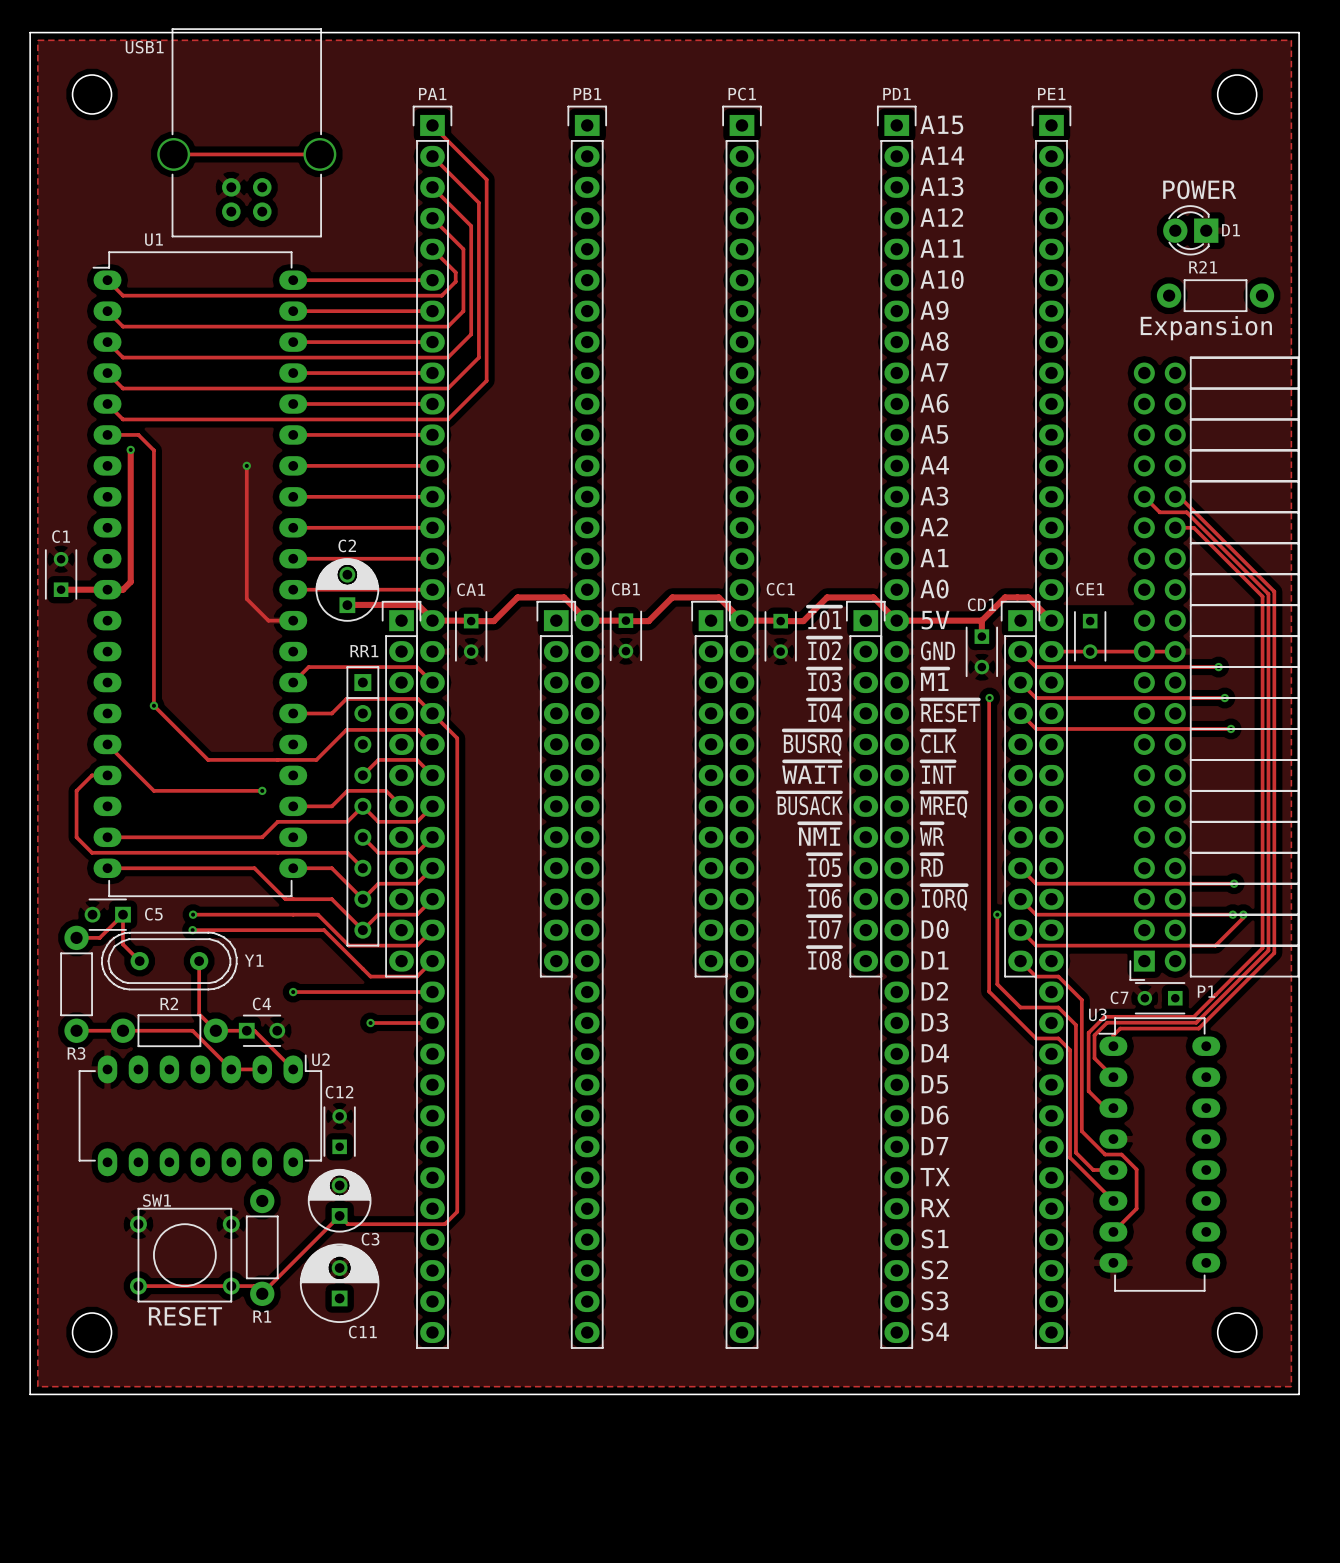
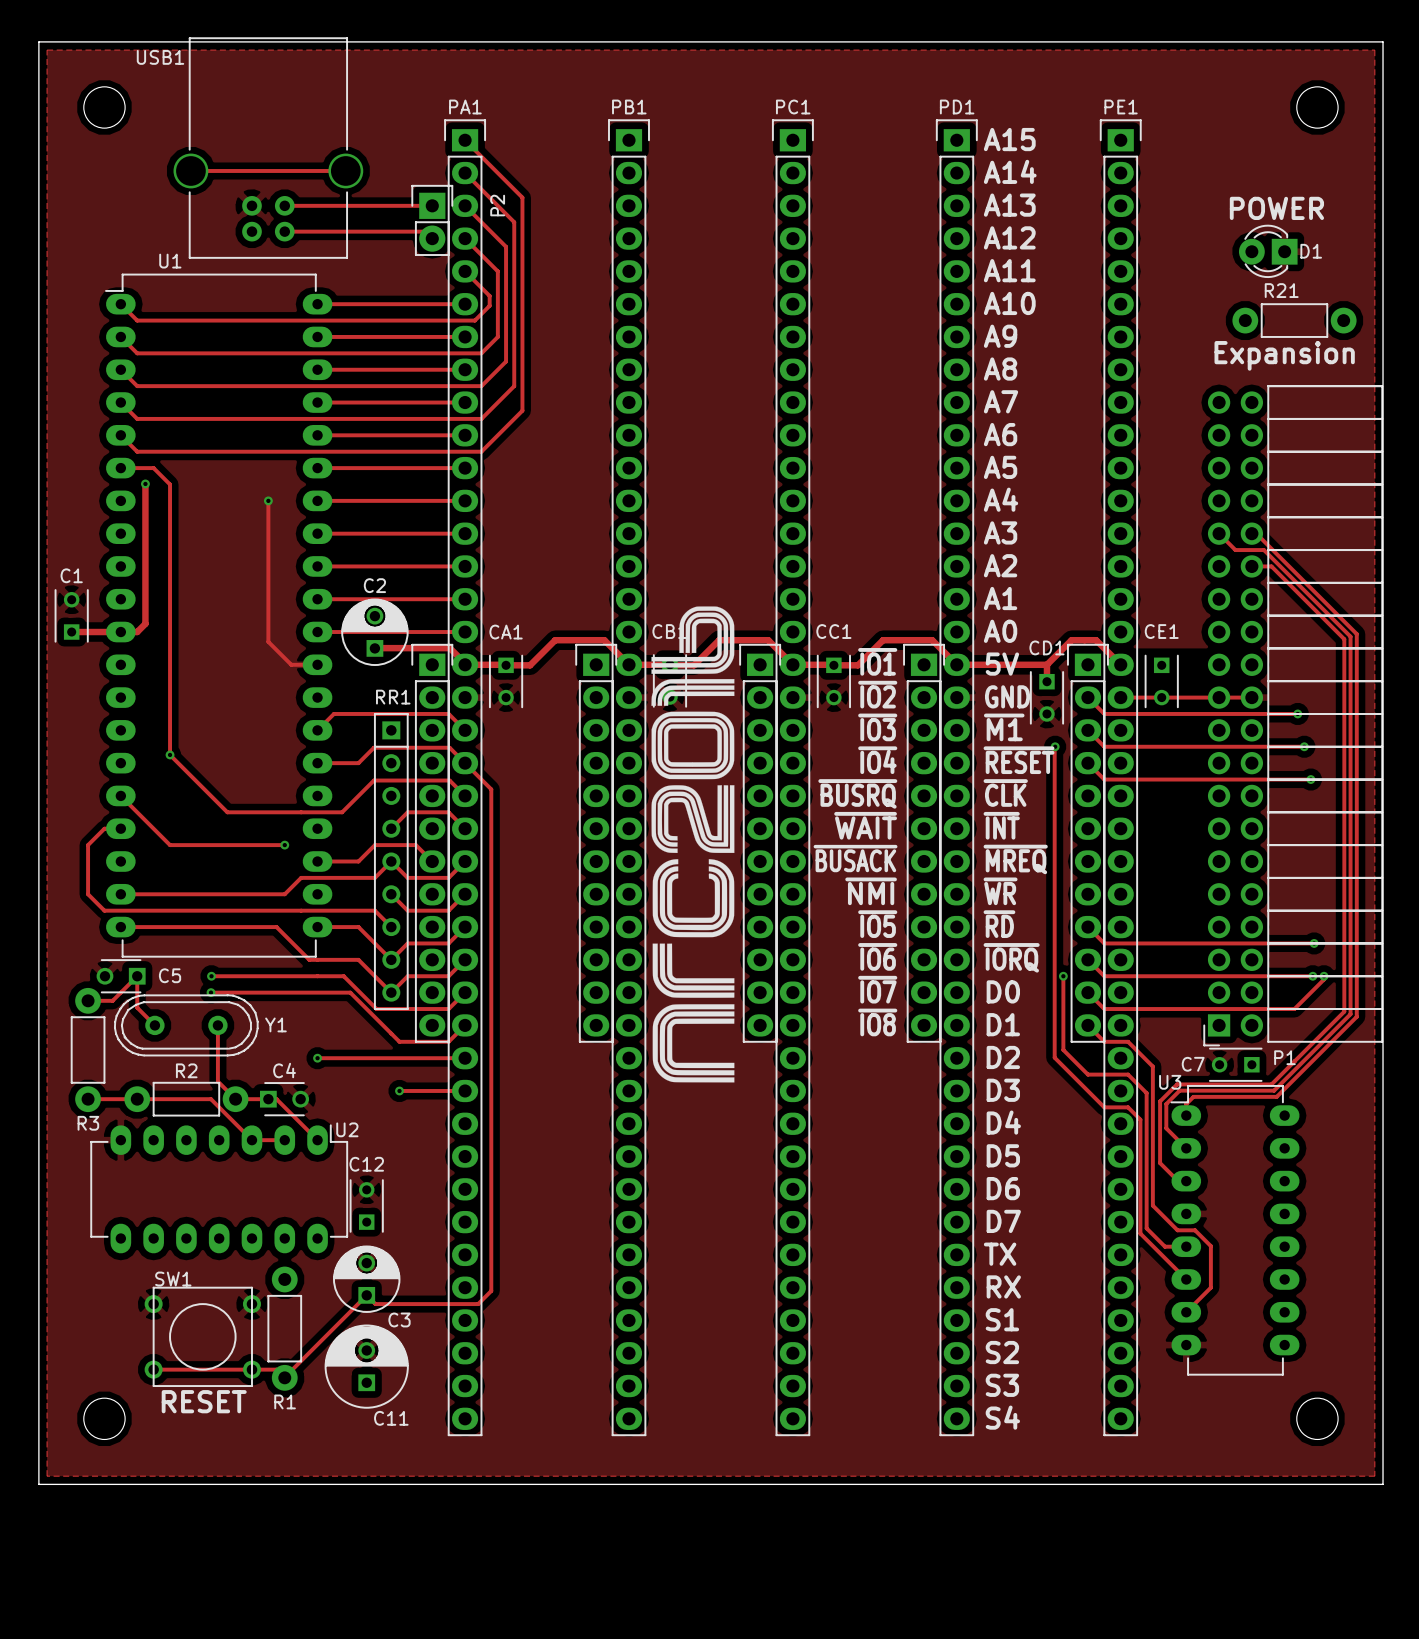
track: none -> (284, 205) (432, 205)
P2: none -> (432, 220)
track: none -> (284, 231) (425, 231) (432, 238)
drawing: none -> [651, 606, 735, 1083]

